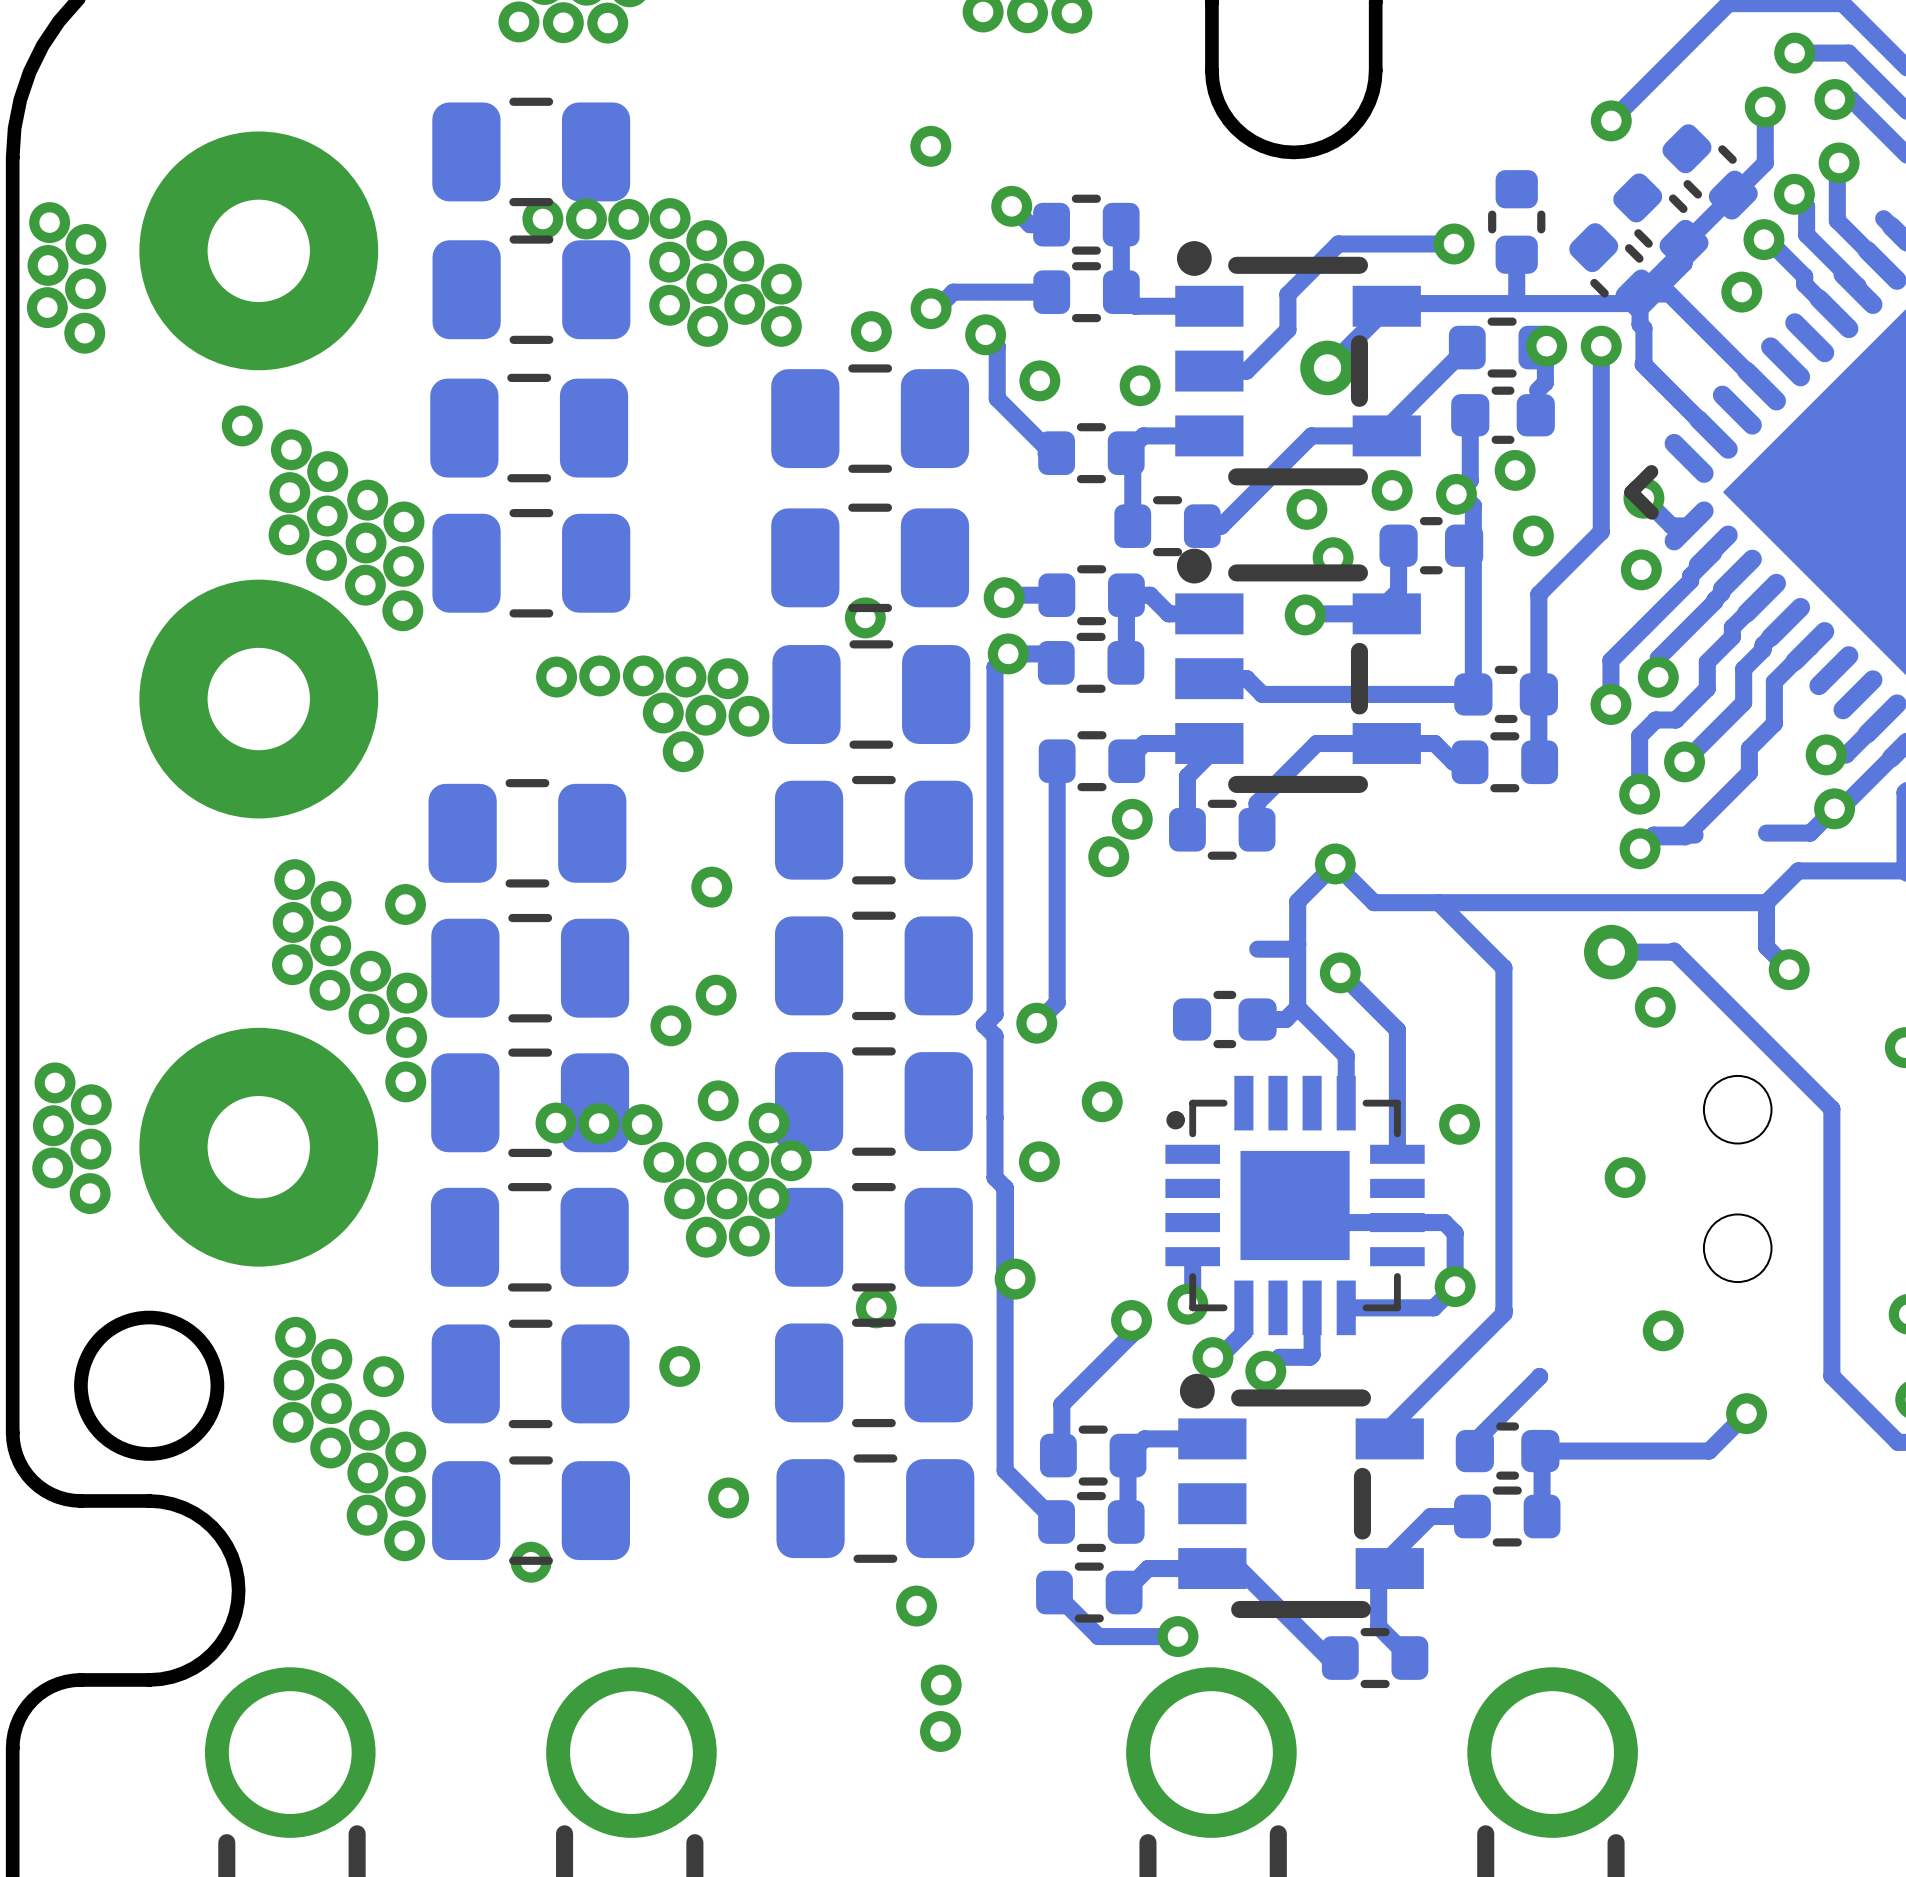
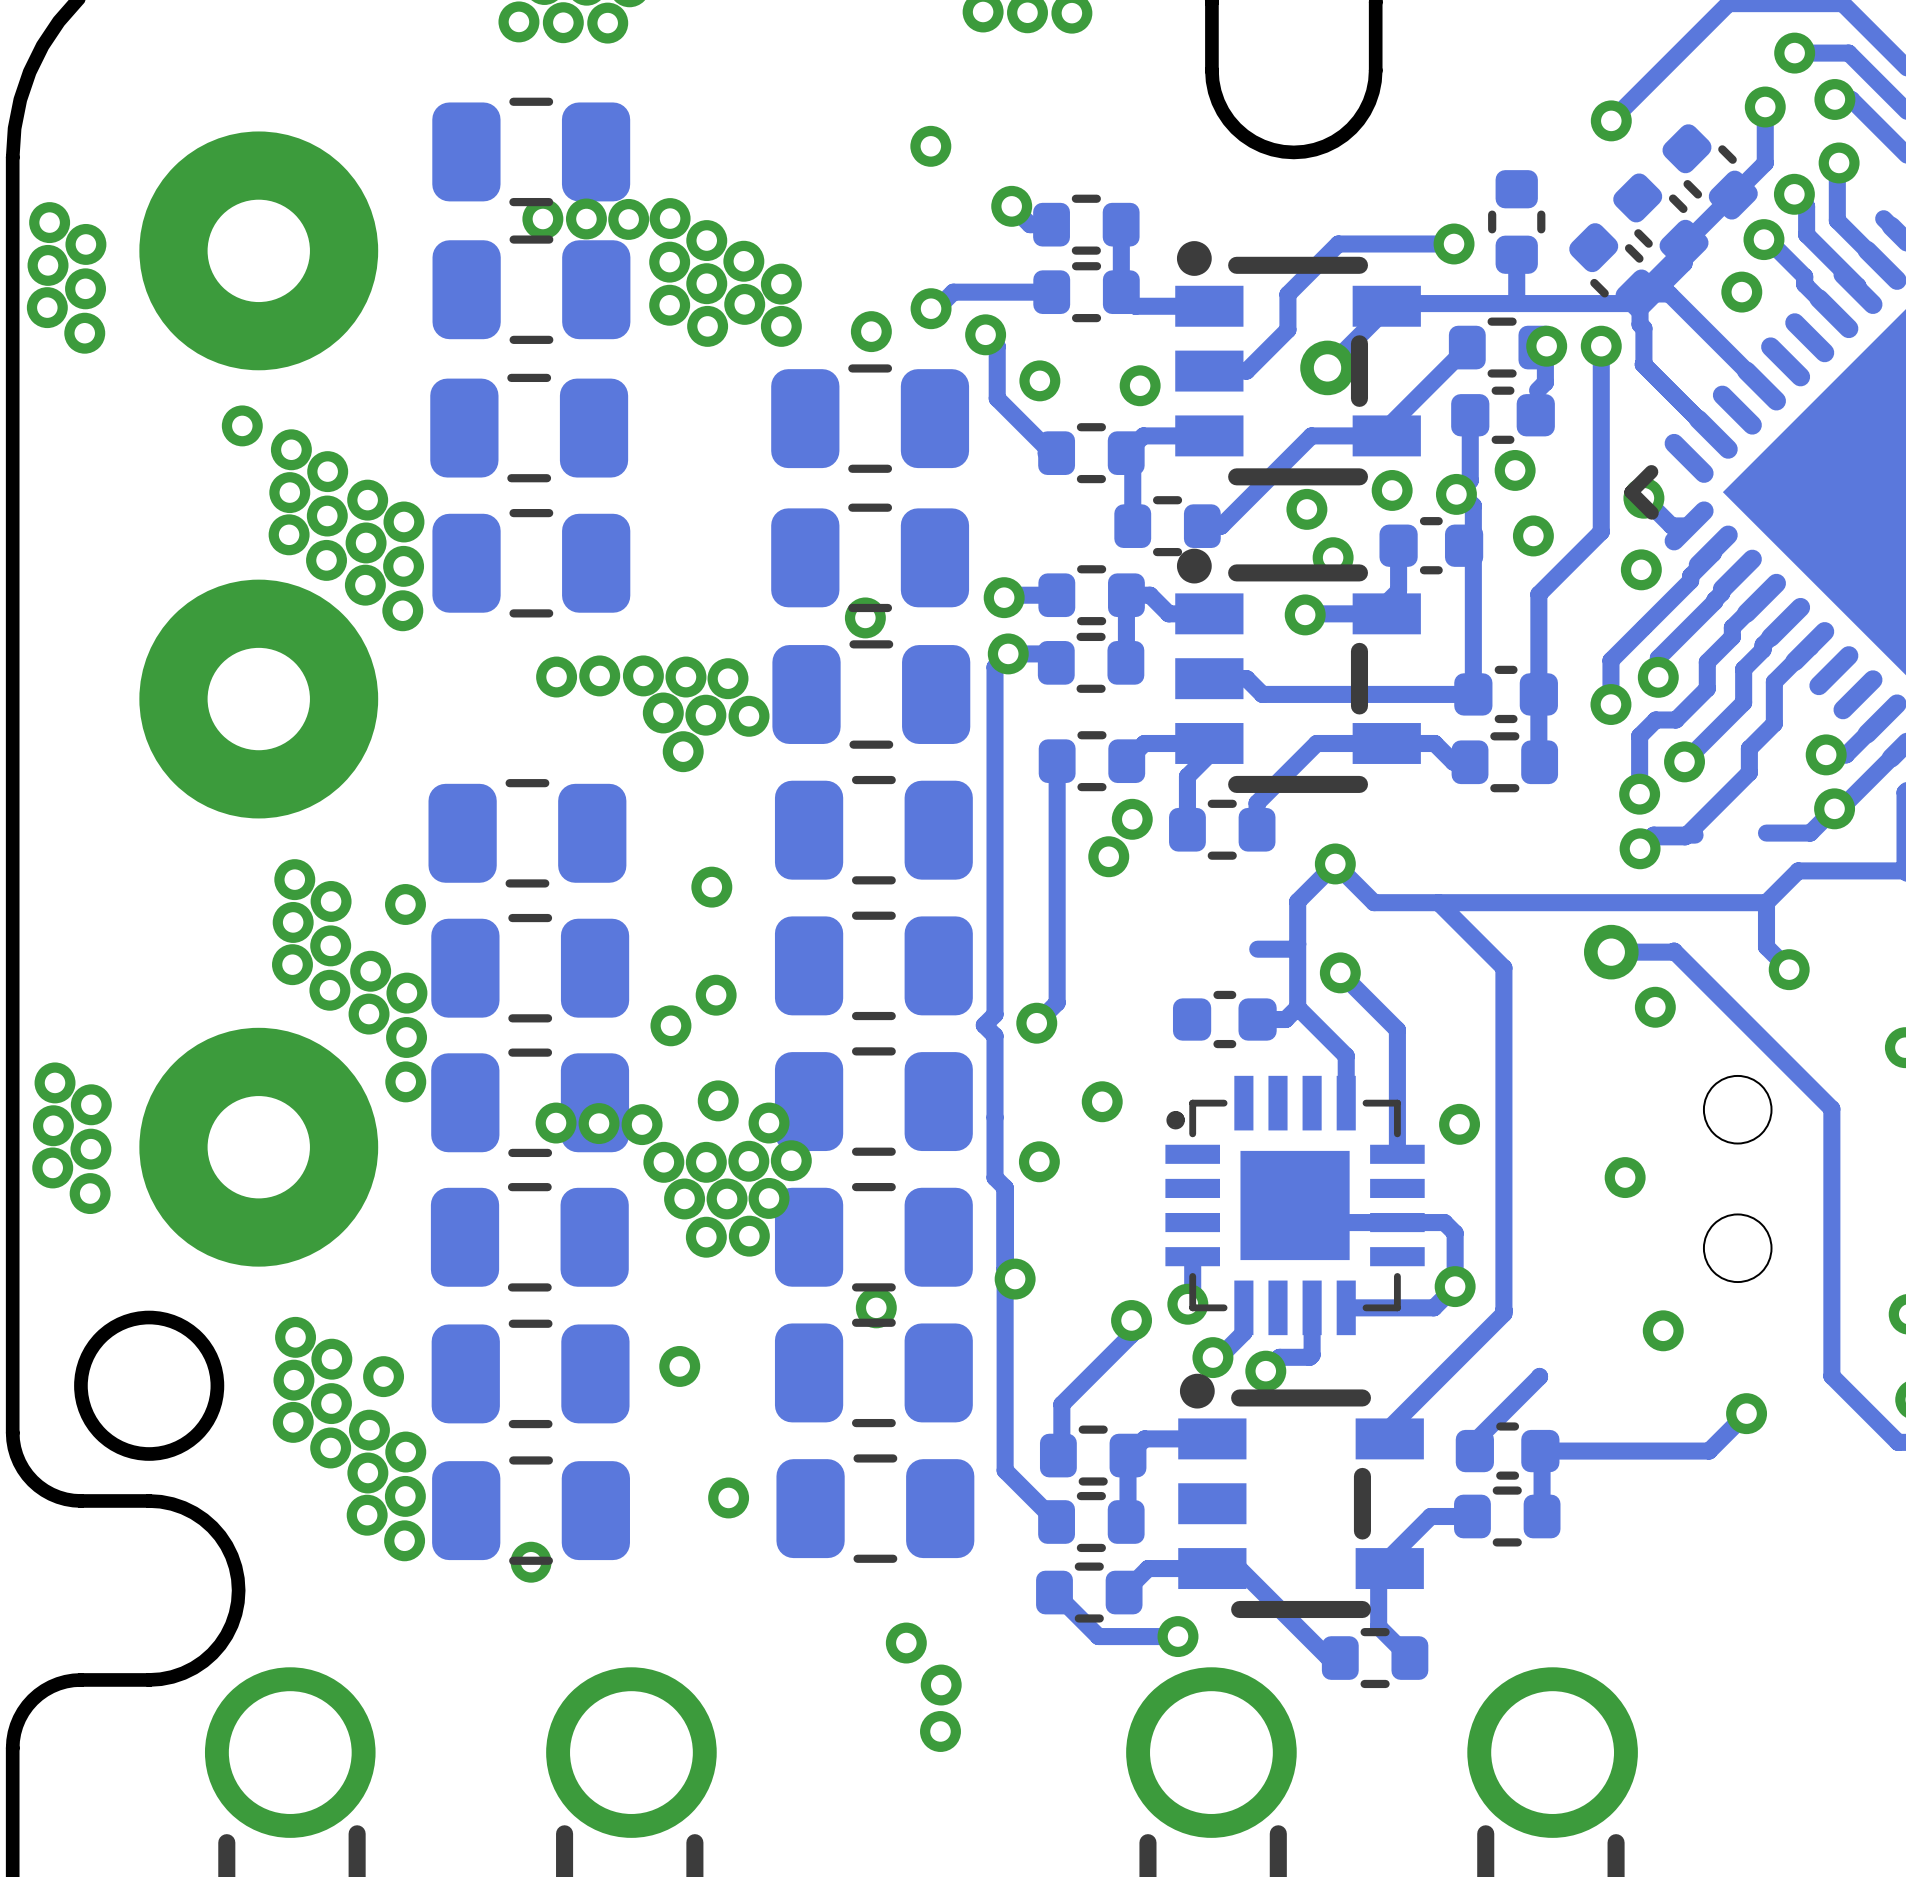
via position: (916, 1606) -> (906, 1643)

